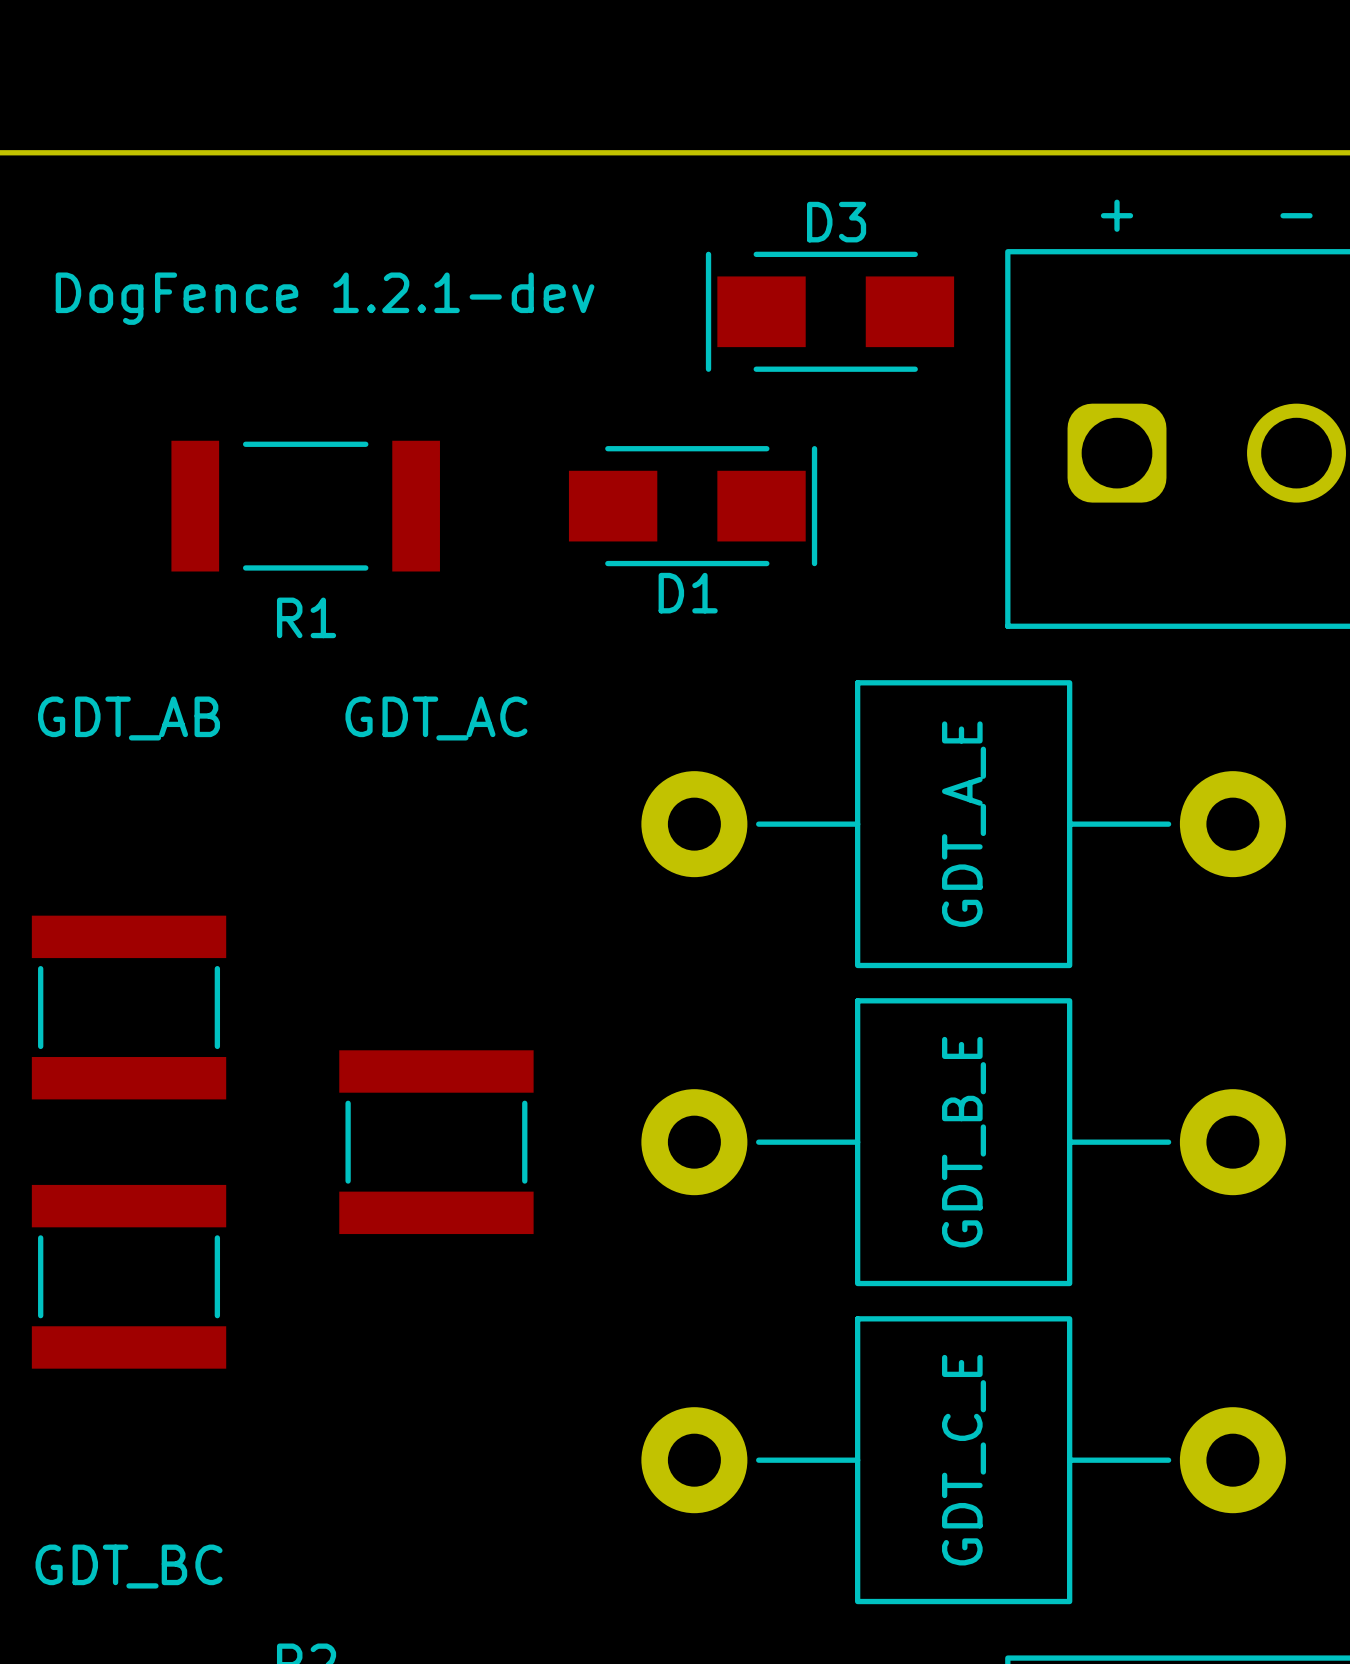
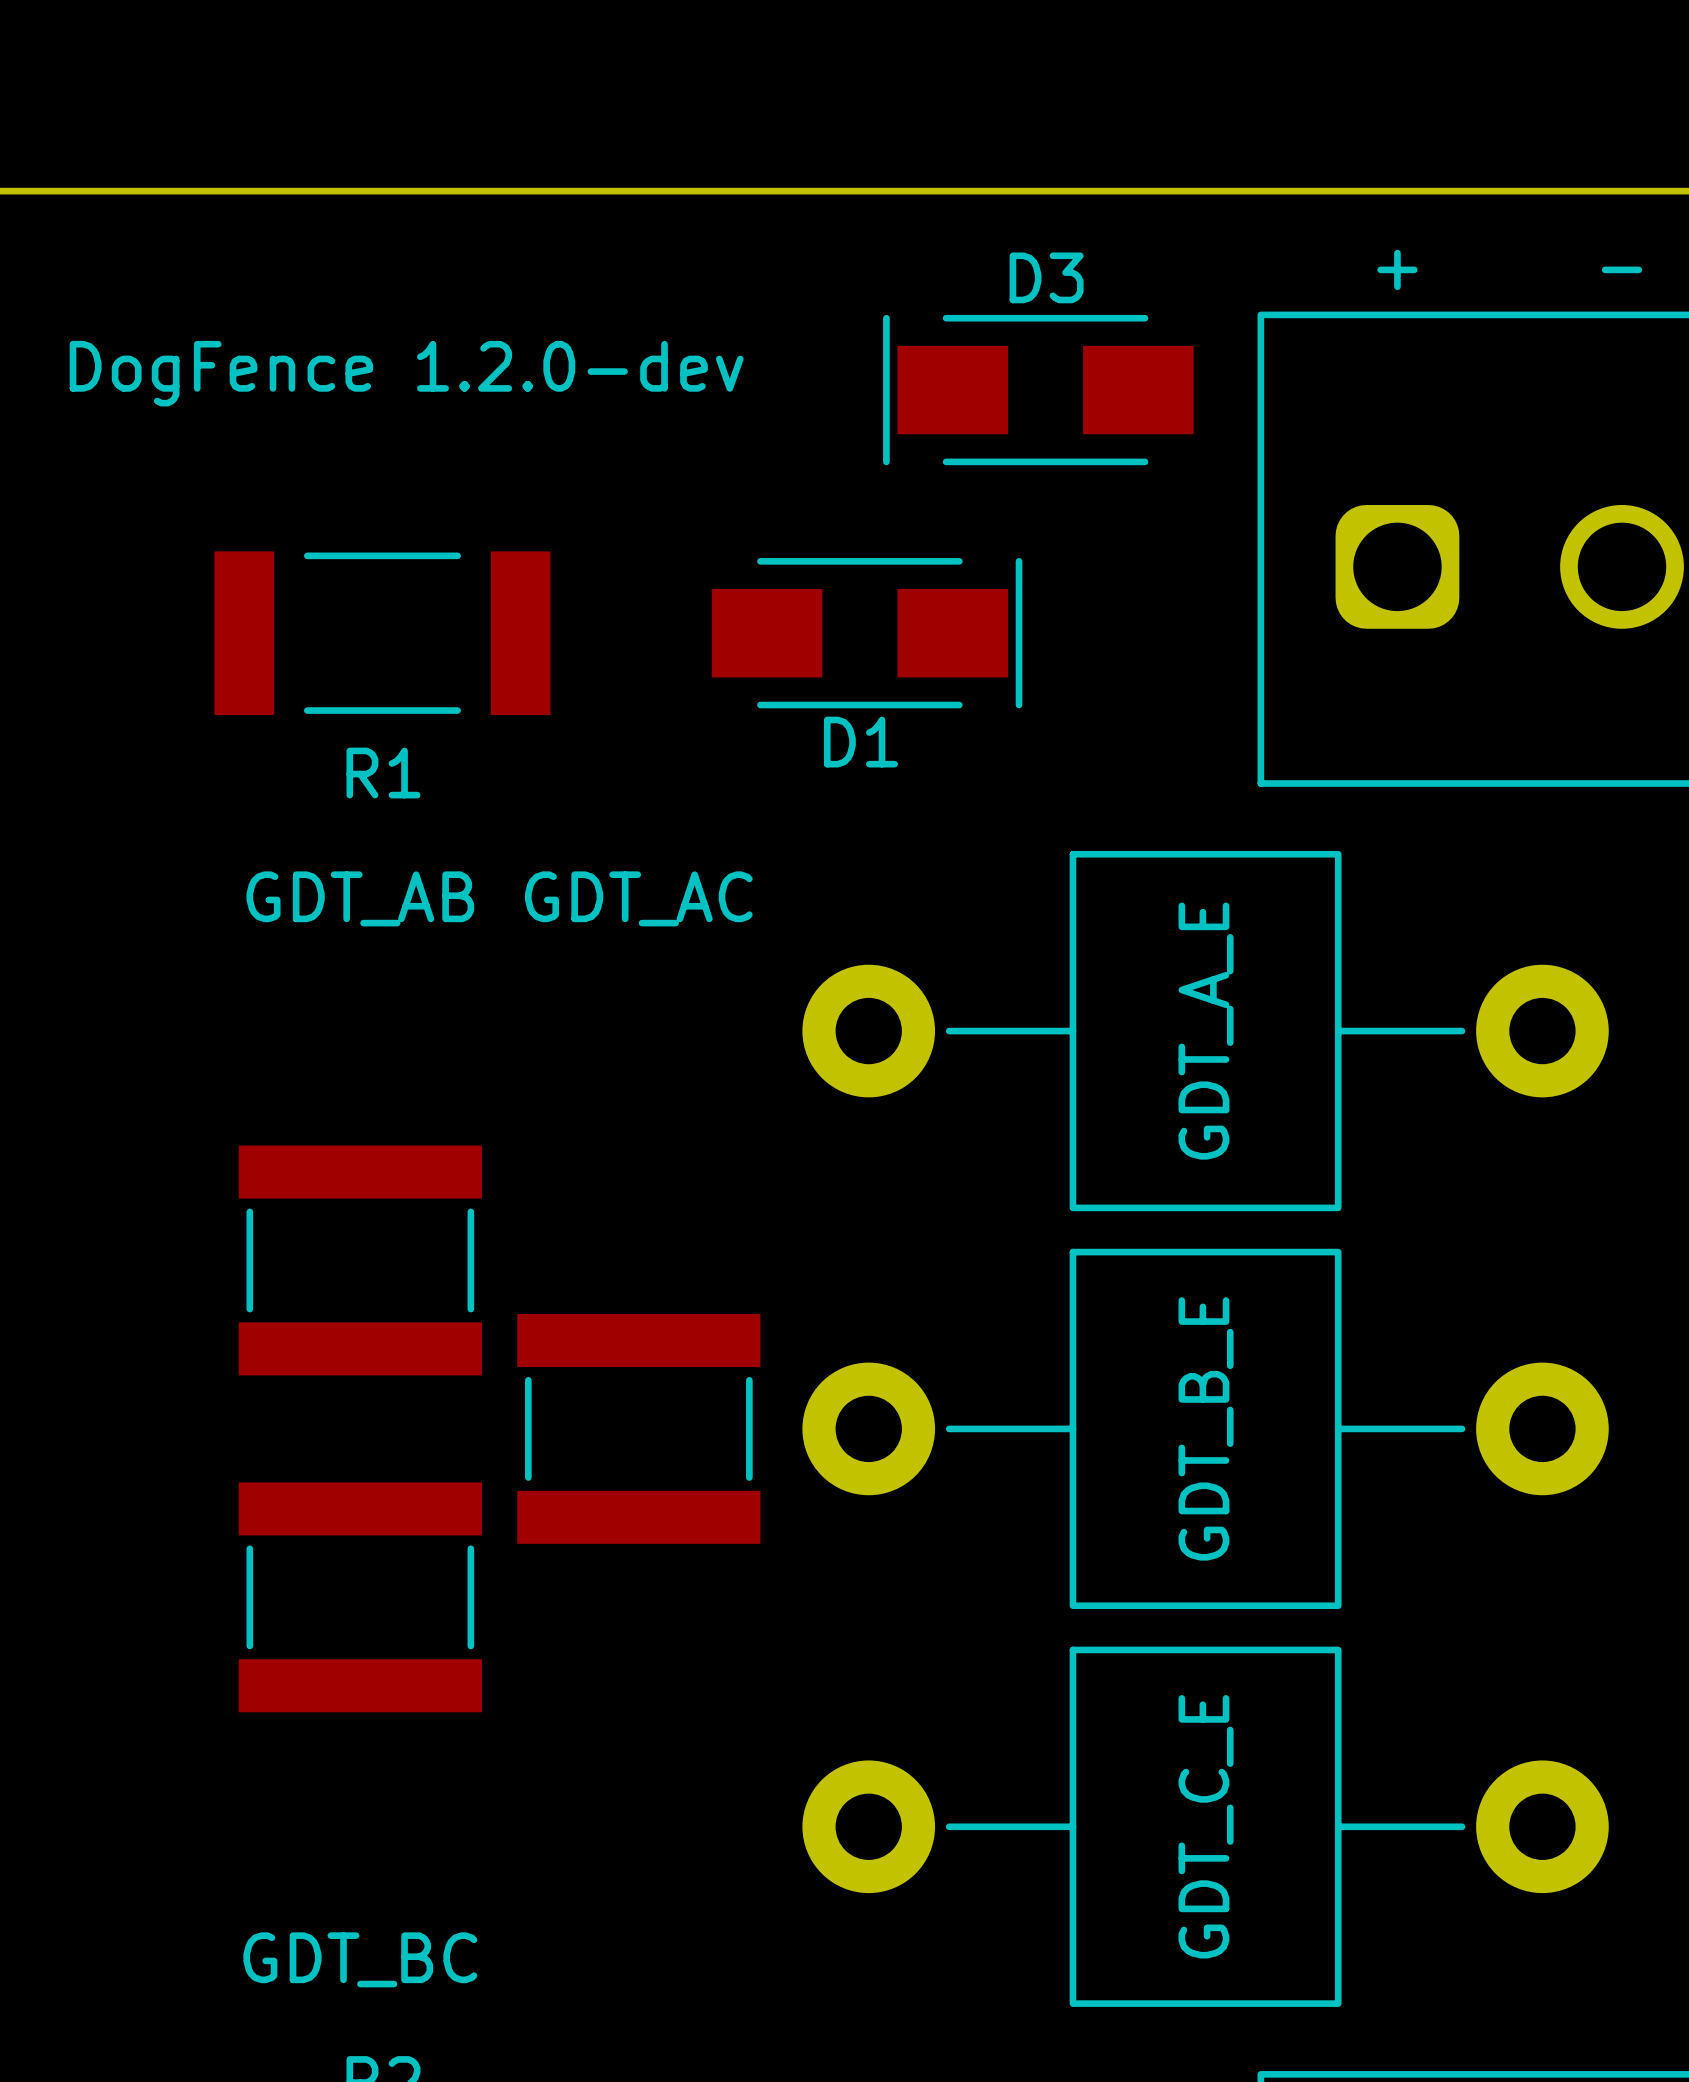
text: DogFence 1.2.1-dev (325, 298) -> DogFence 1.2.0-dev (406, 373)
GDT_AB position: (129, 1007) -> (360, 1260)
GDT_AC position: (436, 1142) -> (638, 1428)
GDT_BC position: (129, 1276) -> (360, 1597)

